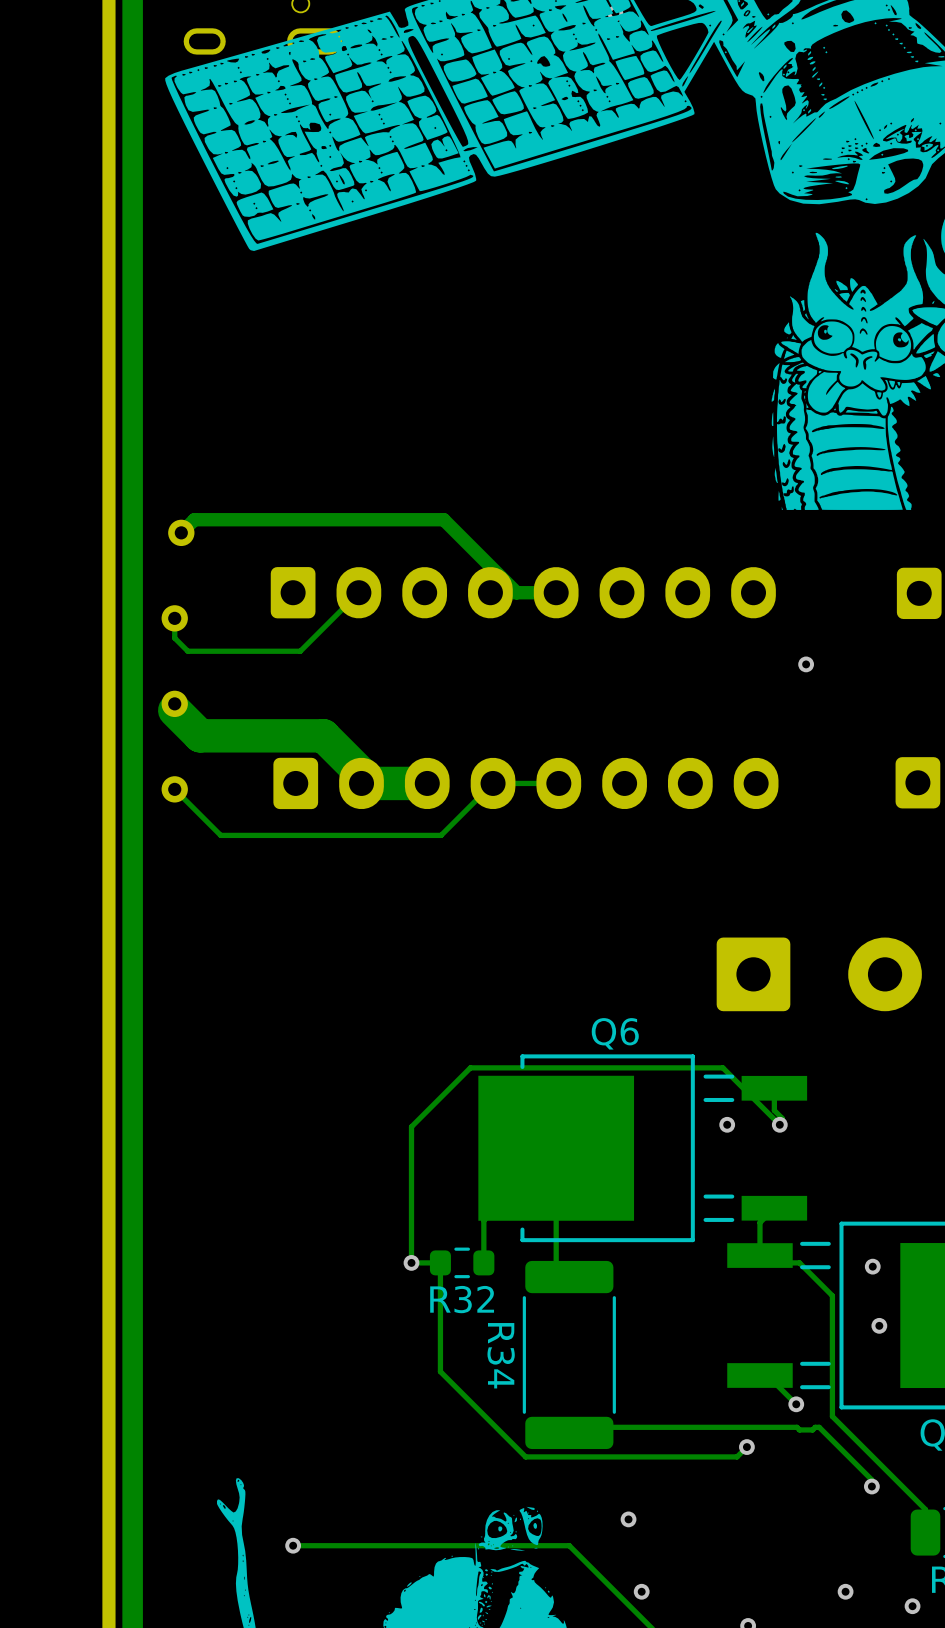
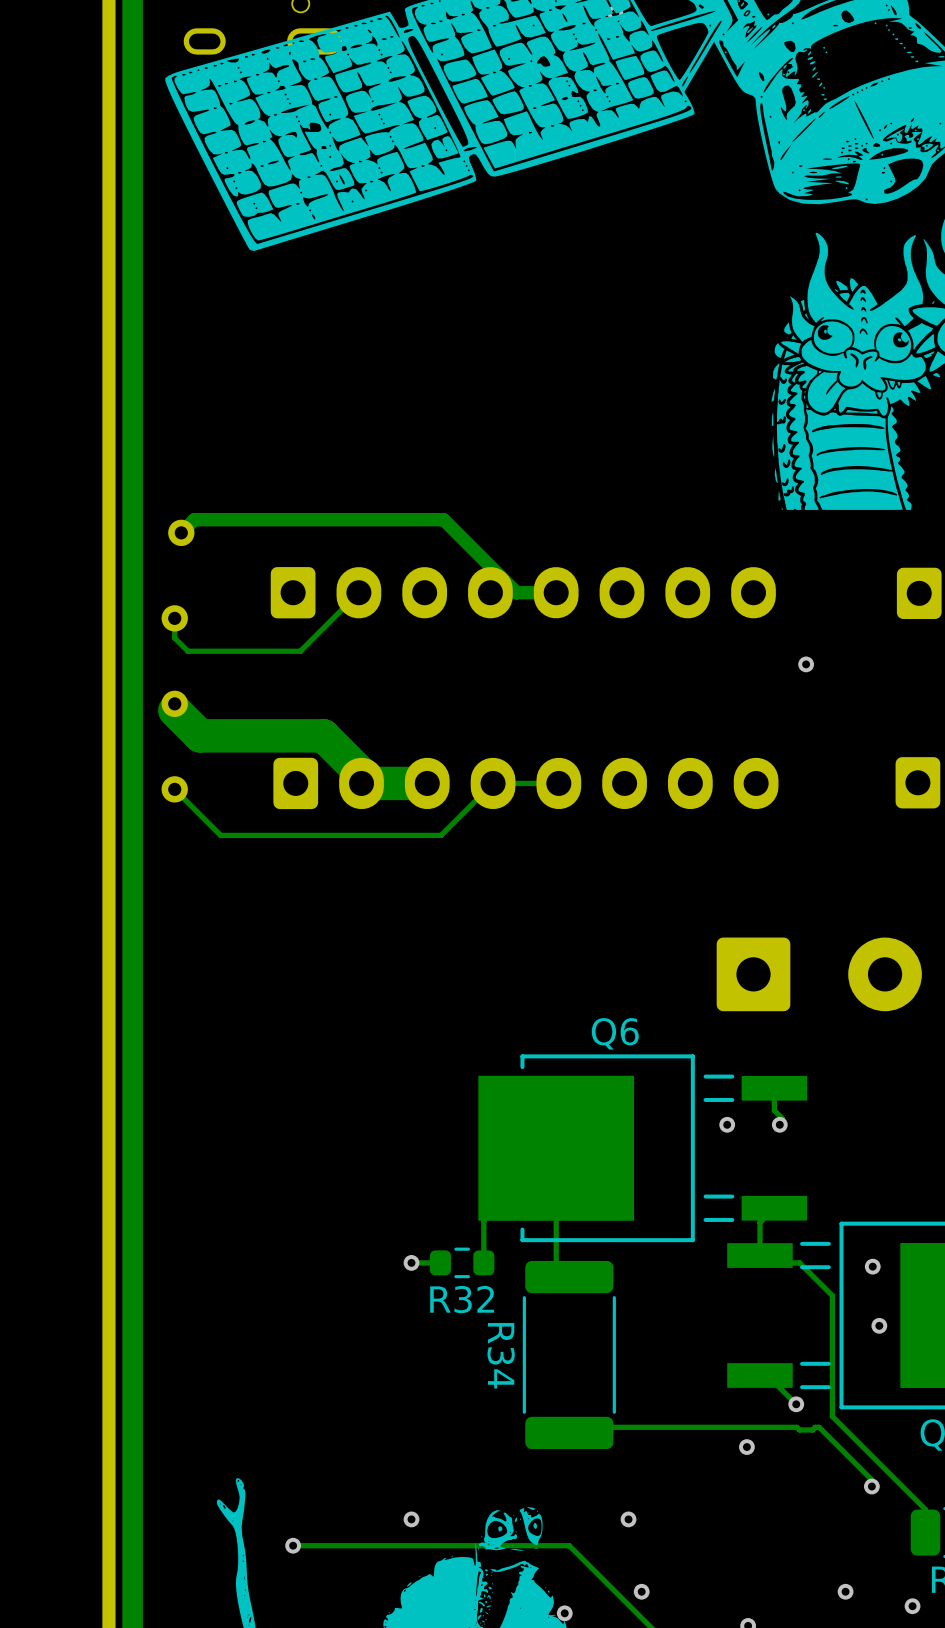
track: (779, 1124) (722, 1067) (470, 1067) (411, 1126) (411, 1262) -> none
track: (440, 1262) (440, 1371) (525, 1456) (737, 1456) (746, 1447) -> none
via: none -> (411, 1519)
via: none -> (564, 1613)

